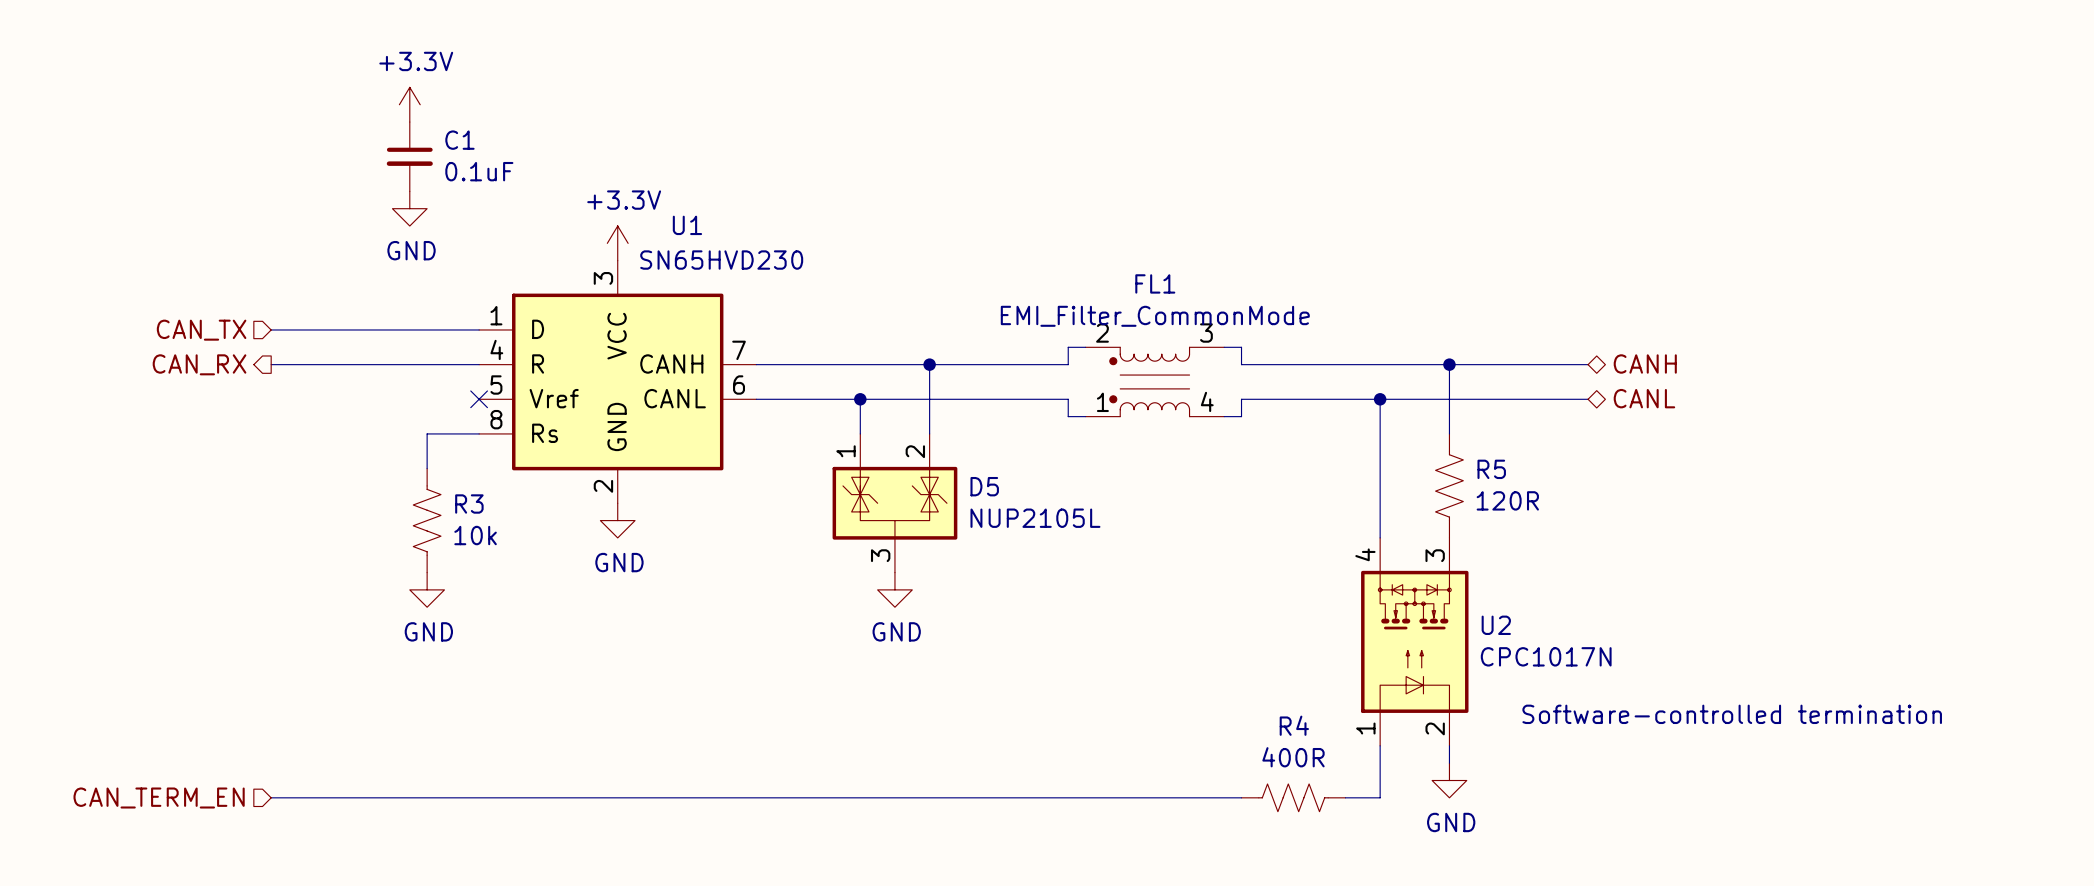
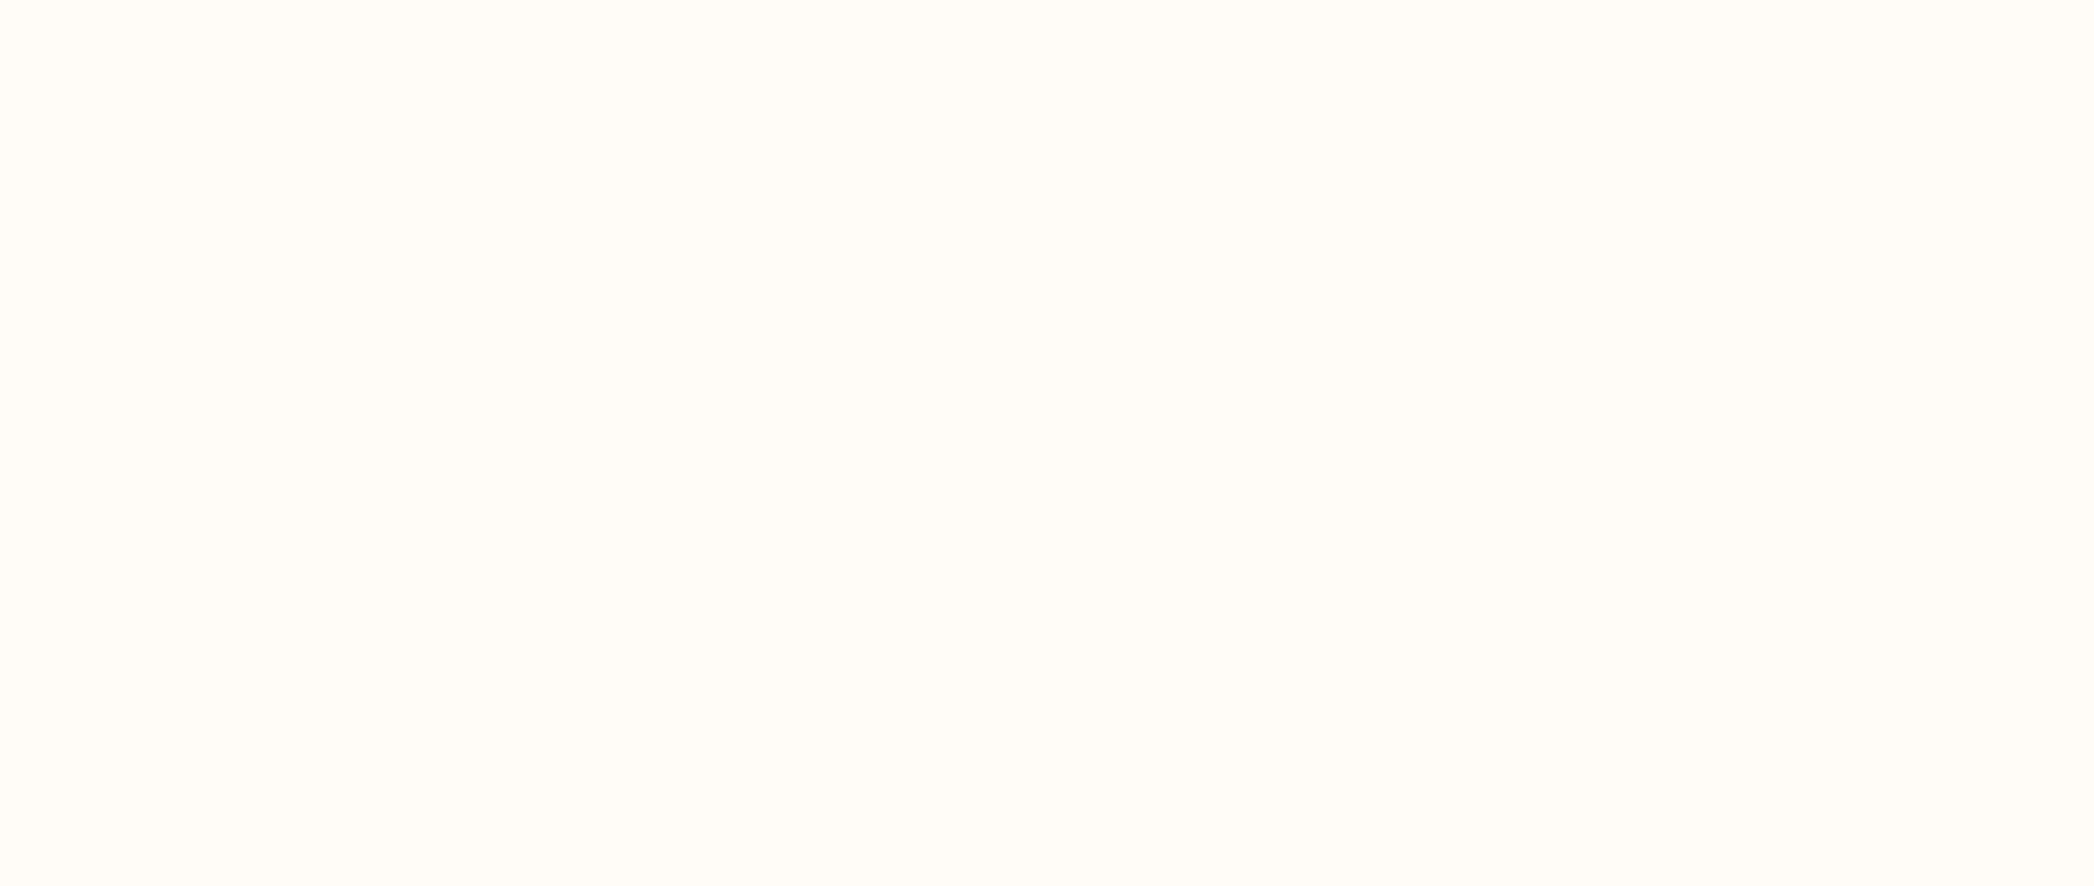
power symbol: +3.3V (409, 104) -> none
C1: 0.1uF (409, 156) -> none
power symbol: GND (409, 208) -> none
power symbol: +3.3V (617, 243) -> none
wire: (271, 329) (479, 329) -> none
hierarchical label: CAN_TX (201, 330) -> none
wire: (1085, 347) (1068, 347) (1068, 364) (756, 364) -> none
wire: (1224, 347) (1241, 347) (1241, 364) (1588, 364) -> none
hierarchical label: CANH (1645, 363) -> none
hierarchical label: CAN_RX (199, 364) -> none
wire: (271, 364) (479, 364) -> none
wire: (929, 364) (929, 433) -> none
junction: (929, 364) -> none
wire: (1449, 364) (1449, 433) -> none
junction: (1449, 364) -> none
U1: SN65HVD230 (617, 381) -> none
FL1: EMI_Filter_CommonMode (1154, 381) -> none
hierarchical label: CANL (1644, 398) -> none
no-connect mark: (479, 399) -> none
wire: (756, 399) (1068, 399) (1068, 416) (1085, 416) -> none
wire: (860, 399) (860, 433) -> none
junction: (860, 399) -> none
wire: (1380, 399) (1380, 537) -> none
junction: (1380, 399) -> none
wire: (1588, 399) (1241, 399) (1241, 416) (1224, 416) -> none
wire: (479, 433) (427, 433) (427, 468) -> none
R5: 120R (1449, 485) -> none
D5: NUP2105L (894, 503) -> none
R3: 10k (427, 520) -> none
power symbol: GND (617, 520) -> none
power symbol: GND (427, 589) -> none
power symbol: GND (894, 589) -> none
U2: CPC1017N (1414, 641) -> none
text: Software-controlled termination (1732, 714) -> none
wire: (1380, 745) (1380, 797) (1345, 797) -> none
wire: (1449, 745) (1449, 763) -> none
power symbol: GND (1449, 780) -> none
wire: (271, 797) (1241, 797) -> none
R4: 400R (1293, 797) -> none
hierarchical label: CAN_TERM_EN (159, 798) -> none

